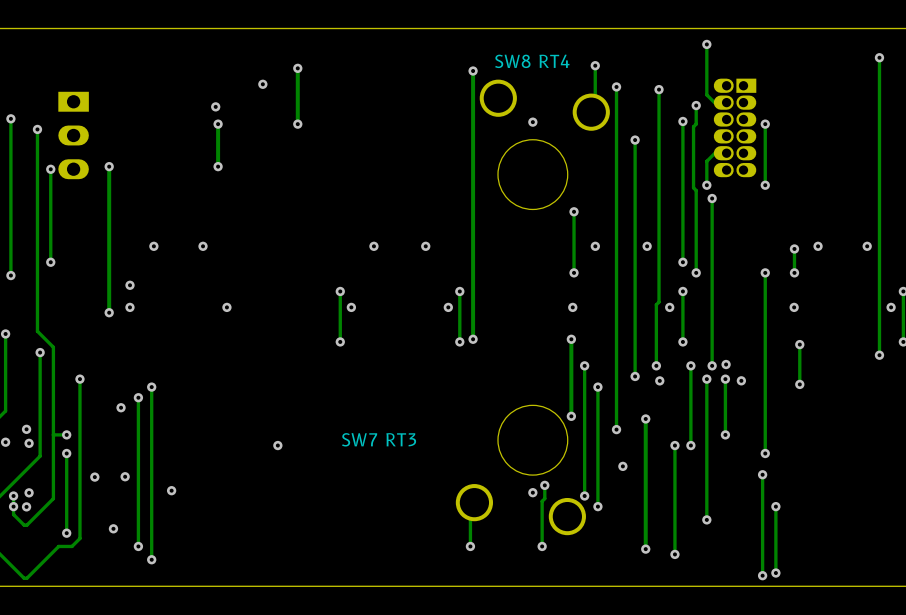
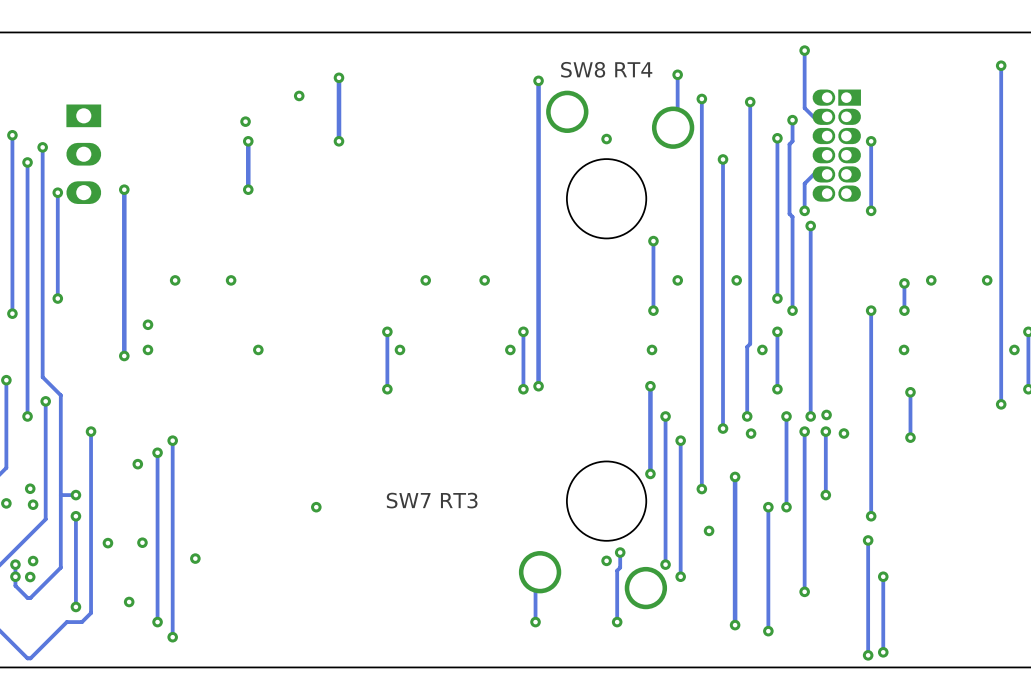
track: none -> (27, 162) (27, 416)
via: none -> (27, 162)
via: none -> (27, 416)

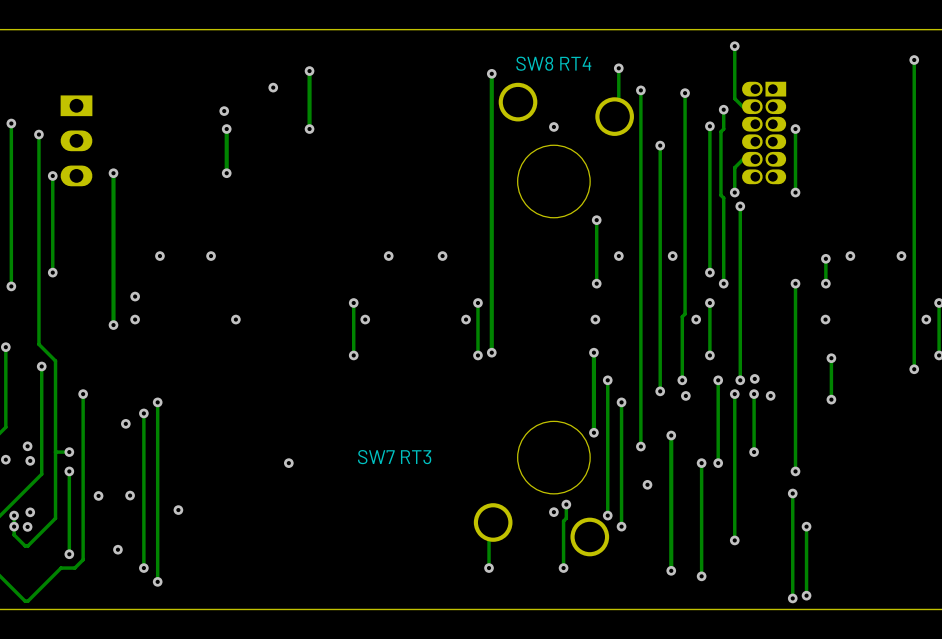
track: (27, 162) (27, 416) -> none
via: (27, 162) -> none
via: (27, 416) -> none

